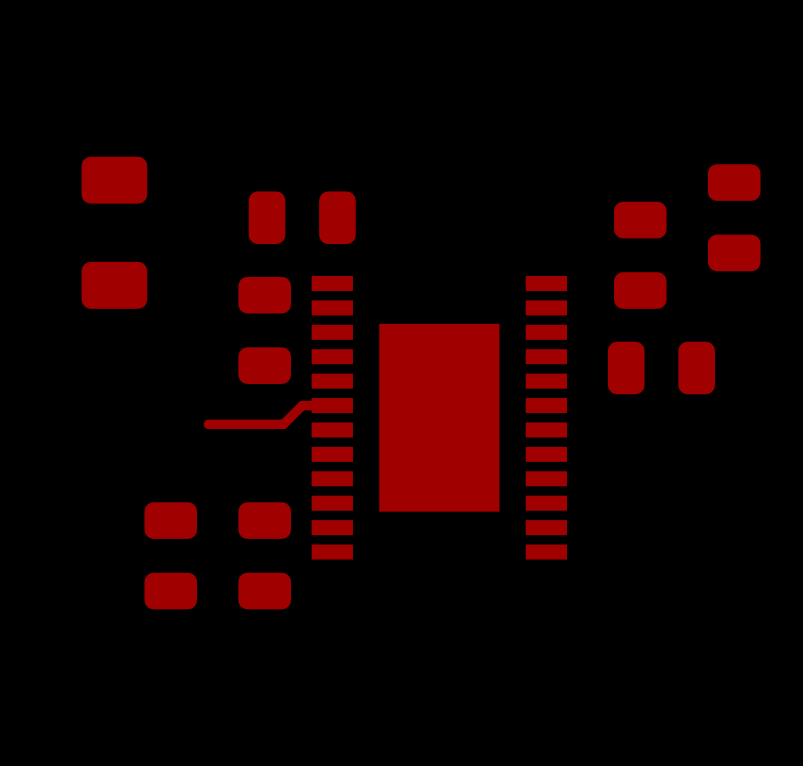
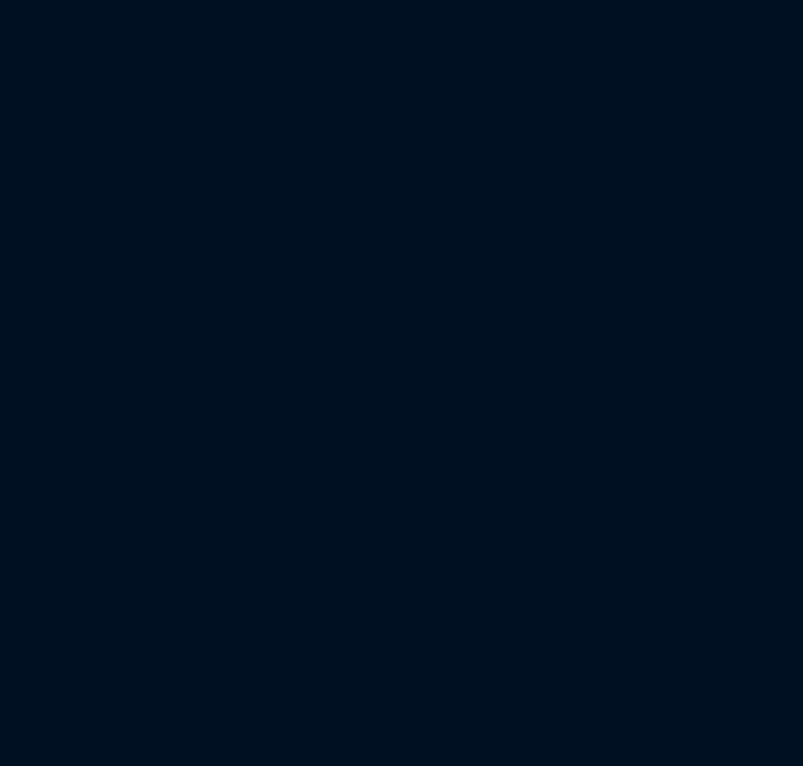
part: (302, 217) -> none
part: (734, 217) -> none
part: (114, 232) -> none
part: (640, 255) -> none
part: (264, 330) -> none
part: (661, 367) -> none
top track: (332, 405) (302, 405) (283, 424) (208, 424) -> none
part: (439, 417) -> none
part: (170, 555) -> none
part: (264, 555) -> none

